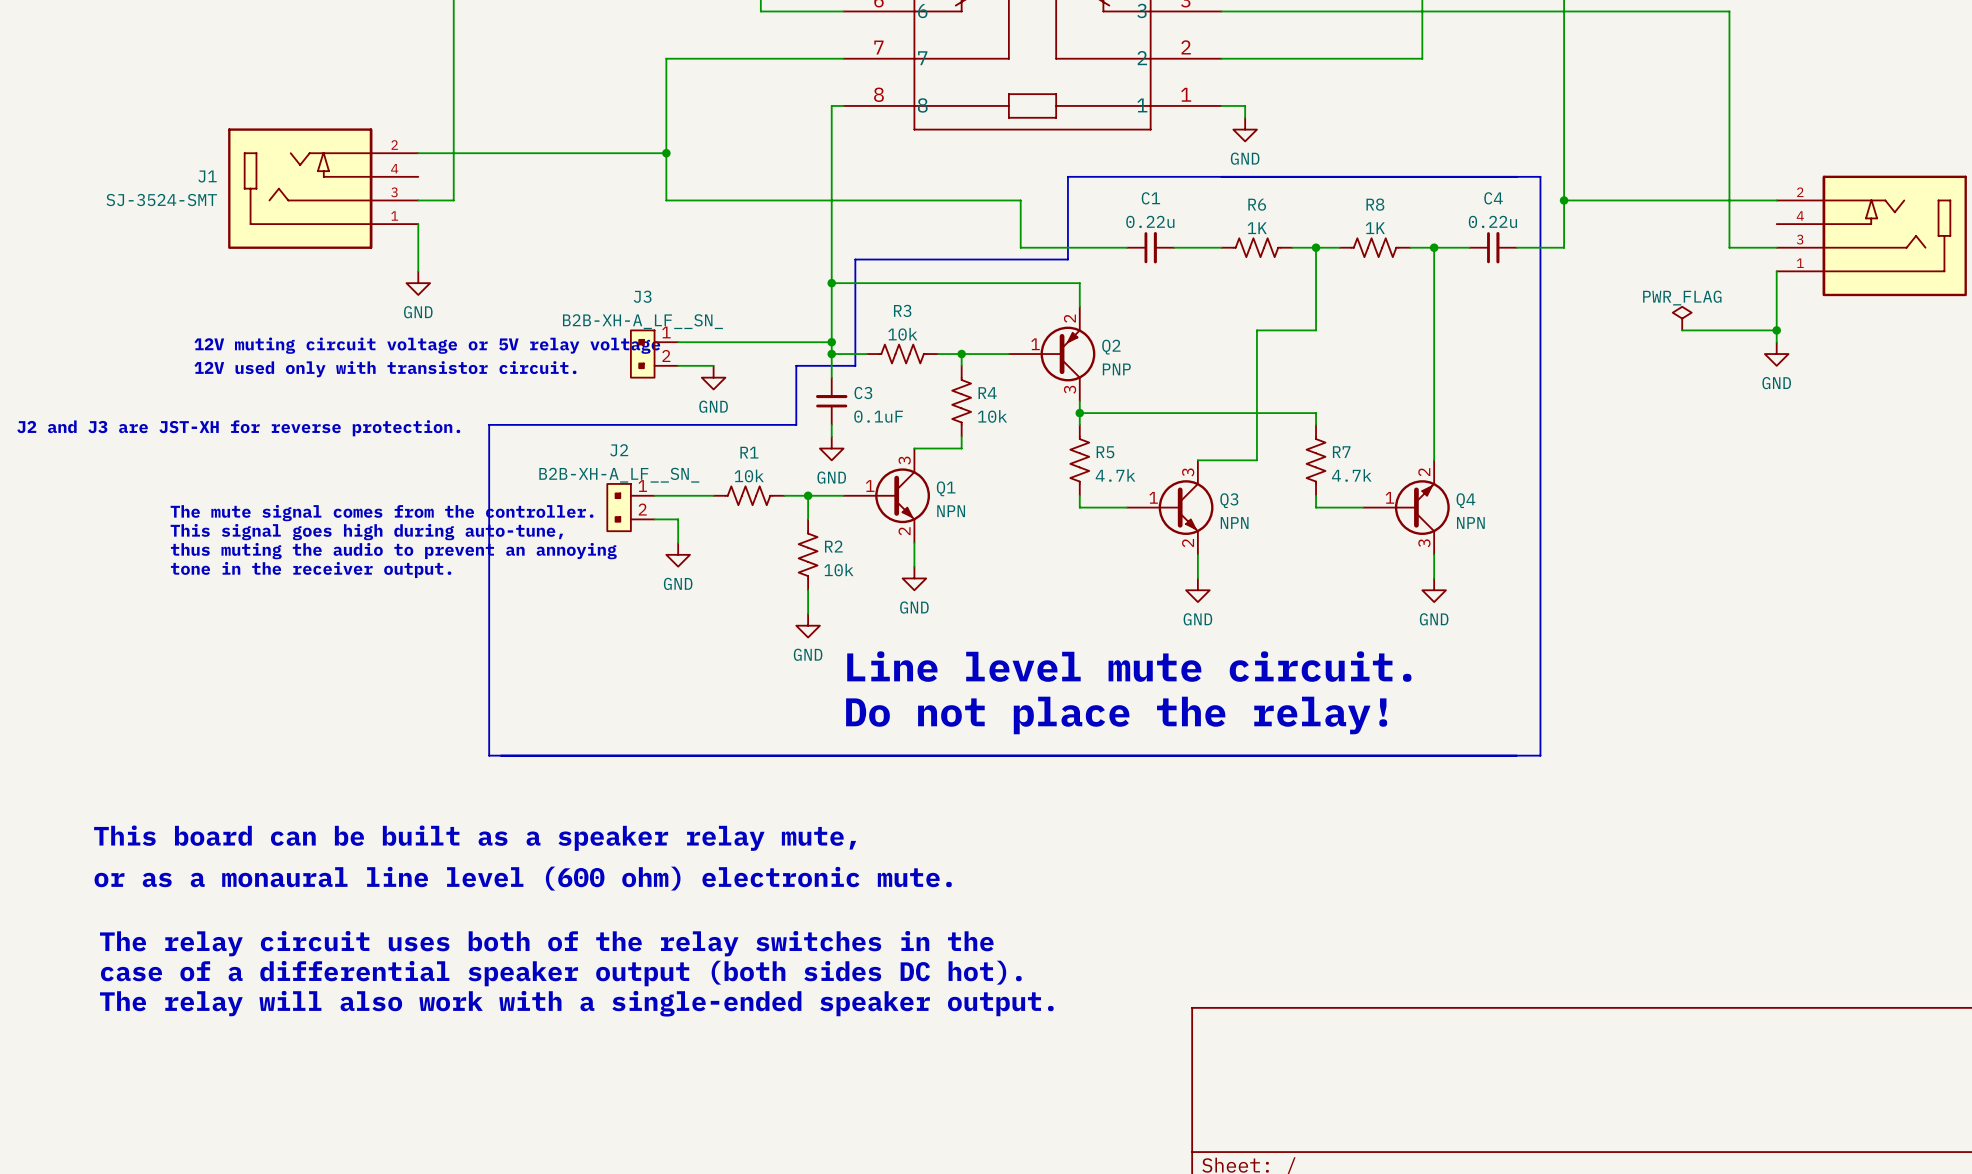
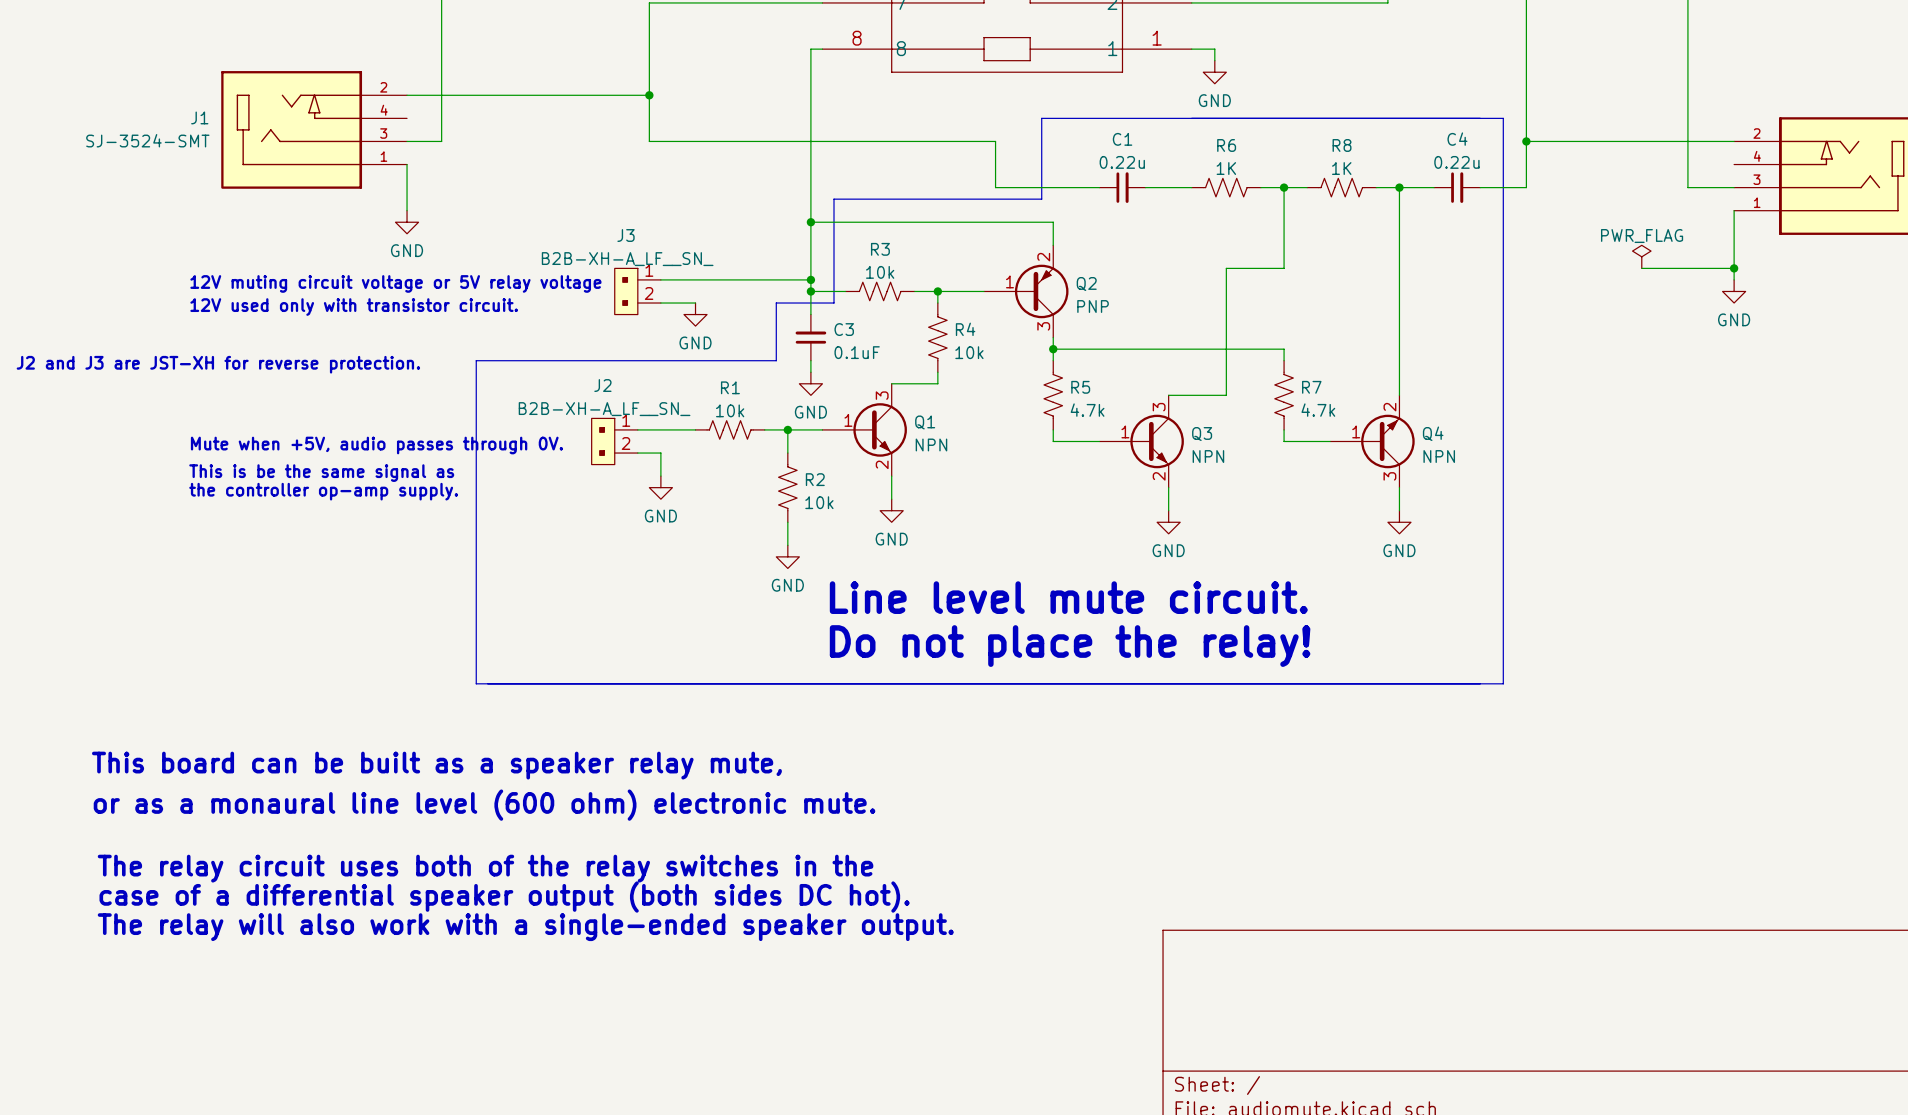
text: none -> Mute when +5V, audio passes through 0V. (376, 445)
text: The mute signal comes from the controller. (382, 513) -> none
text: This signal goes high during auto-tune, (366, 532) -> none
text: none -> This is be the same signal as (321, 473)
text: thus muting the audio to prevent an annoying (393, 551) -> none
text: none -> the controller op-amp supply. (323, 491)
text: tone in the receiver output. (311, 570) -> none

